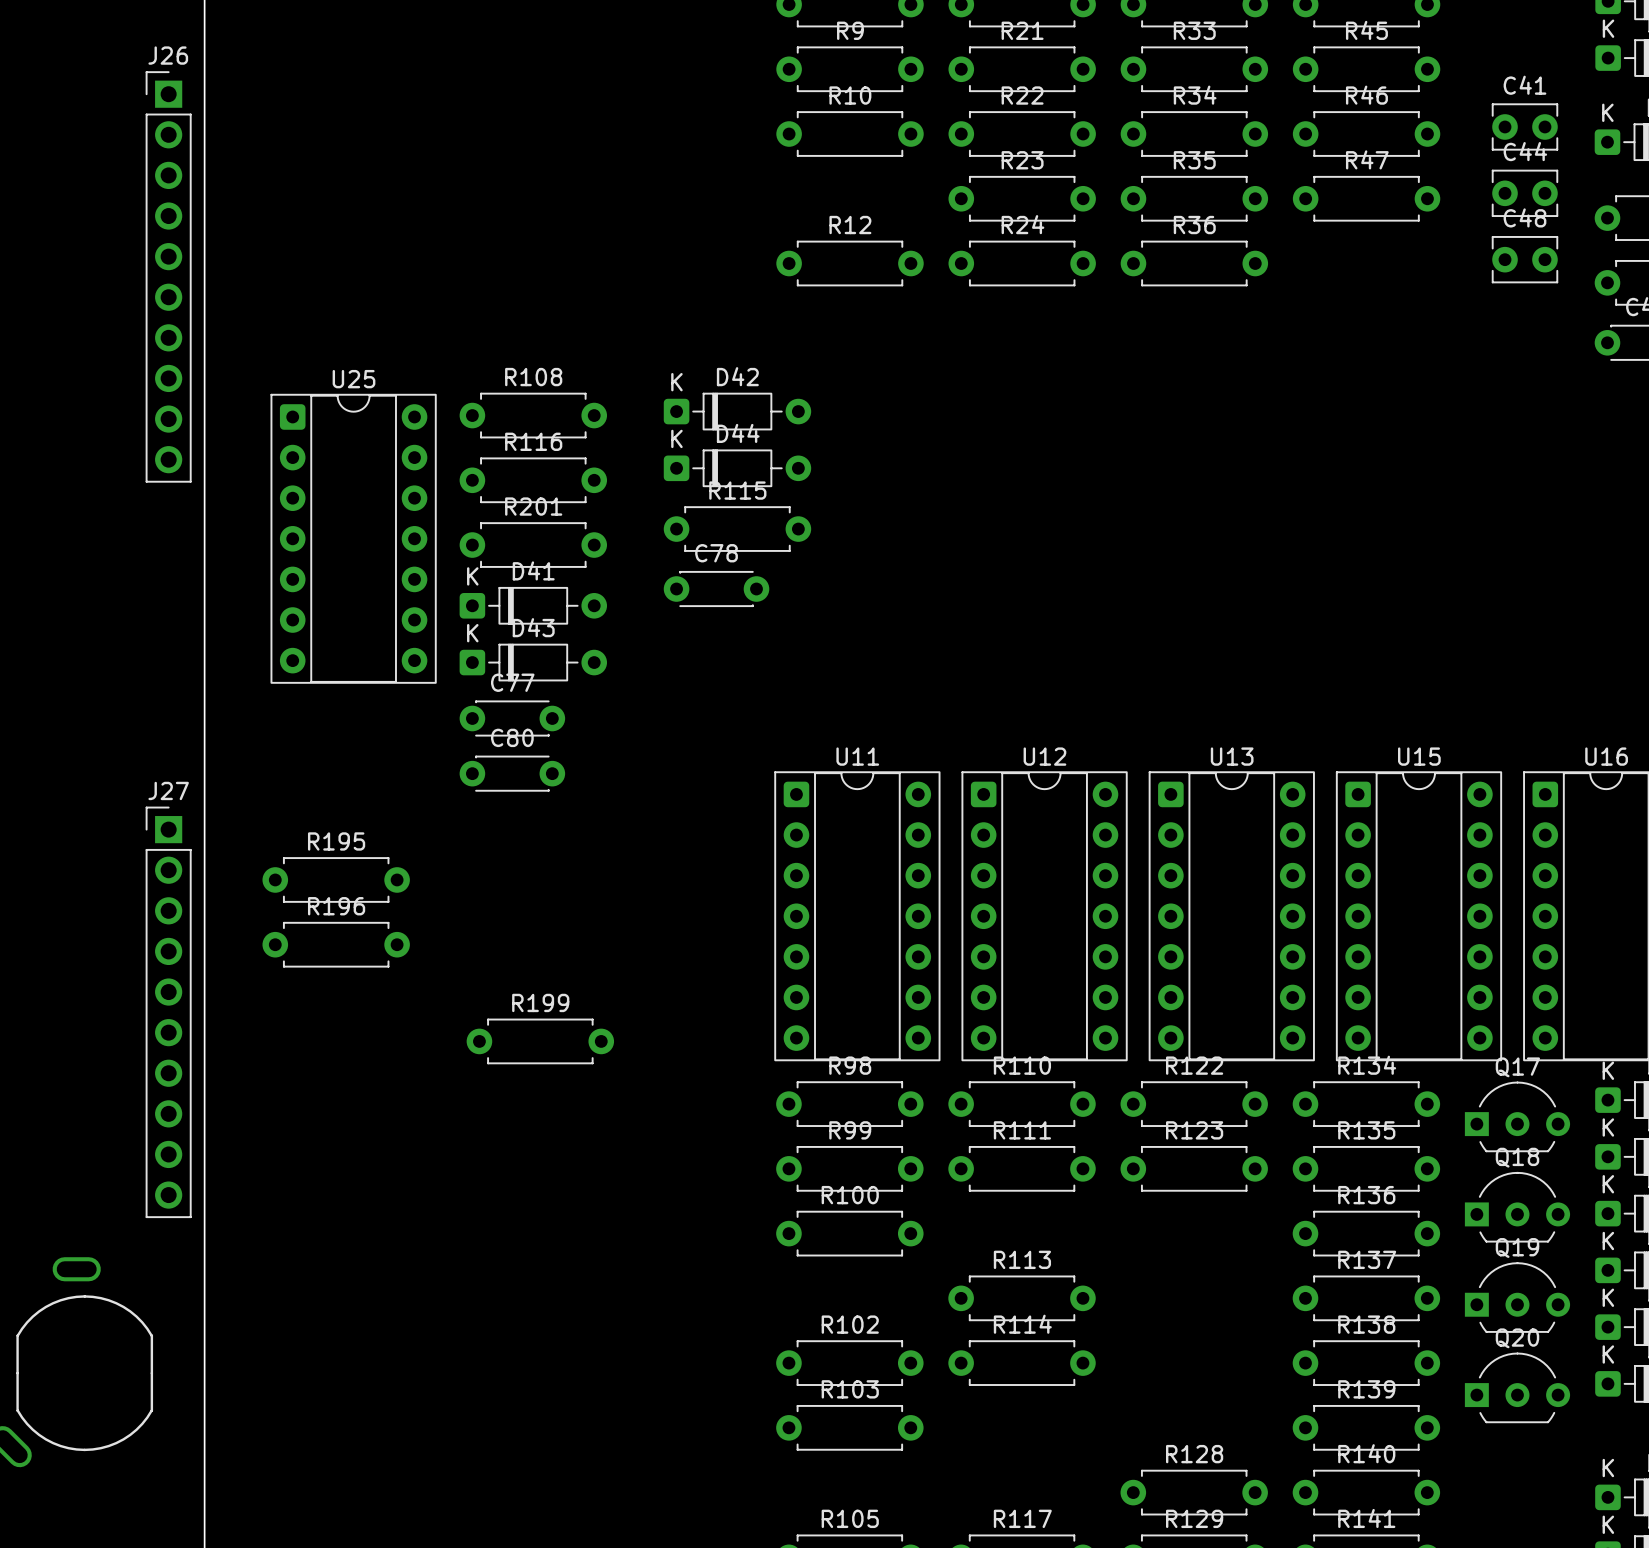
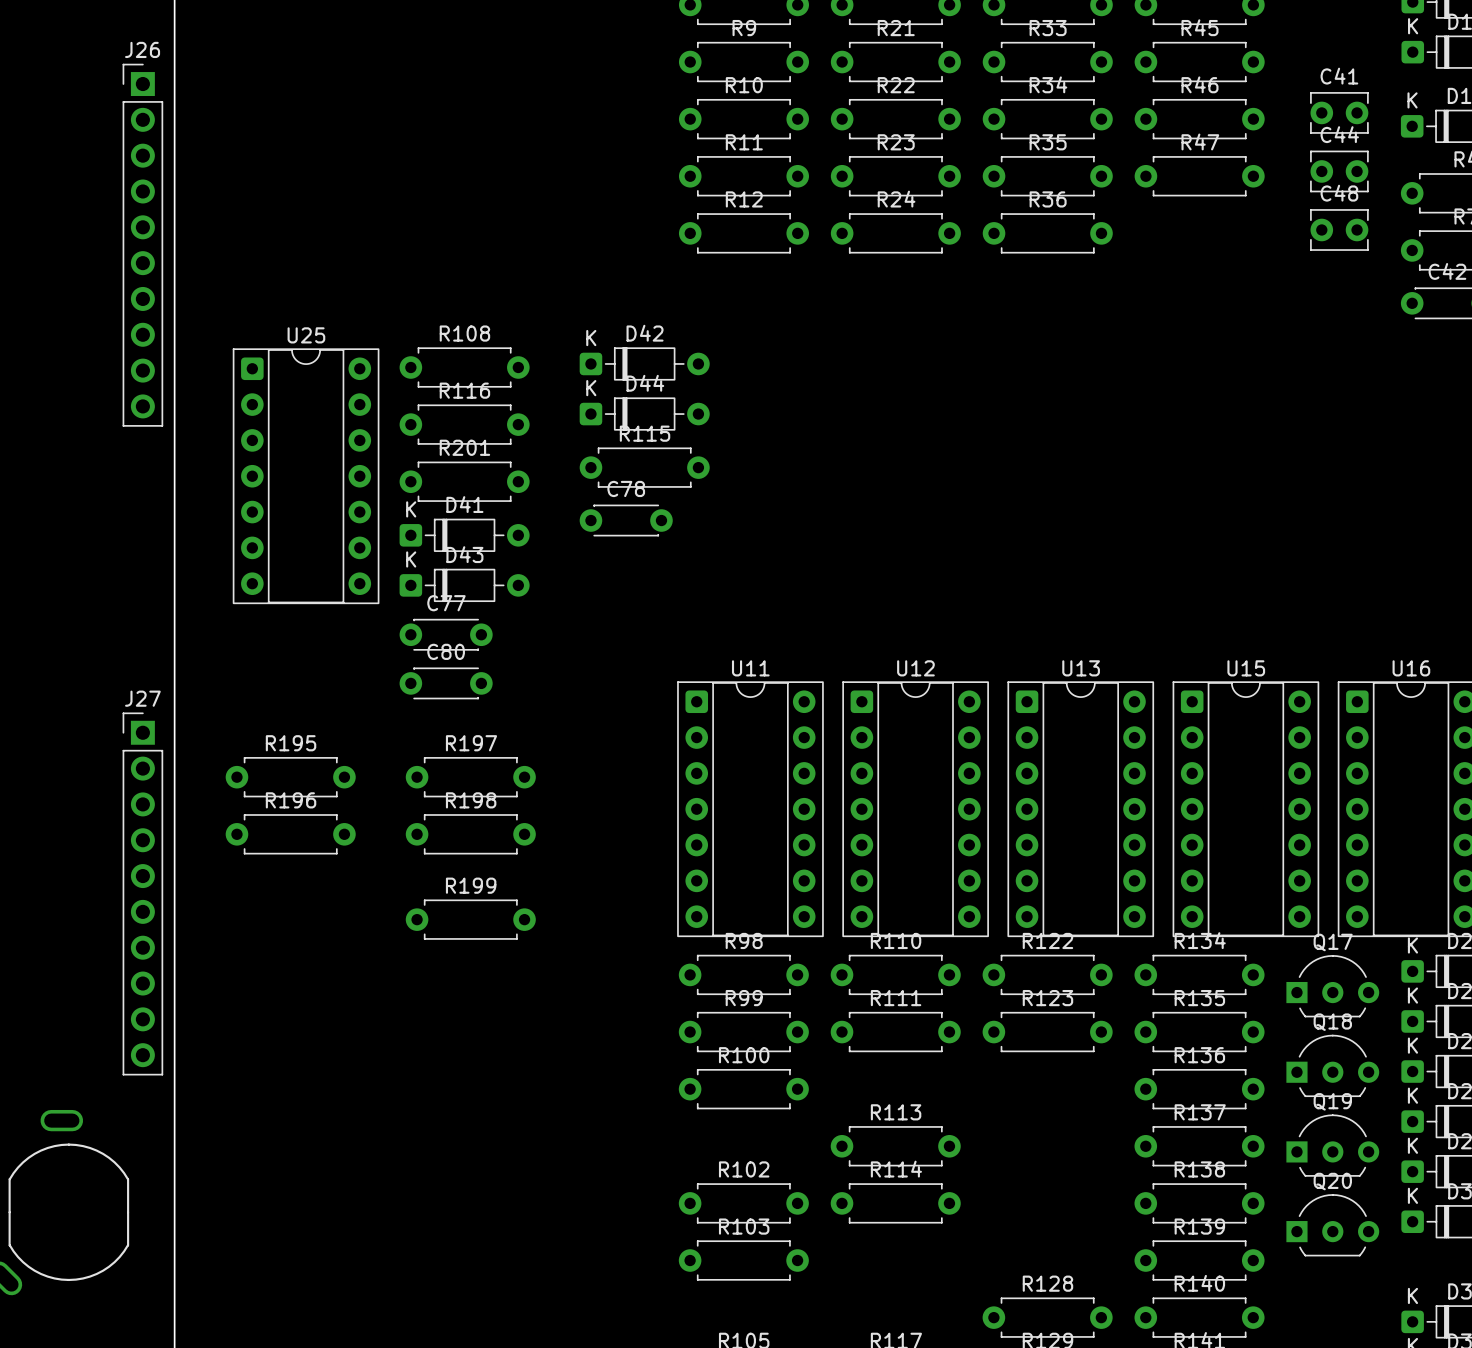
R11: none -> (743, 176)
R197: none -> (470, 777)
R198: none -> (470, 834)

